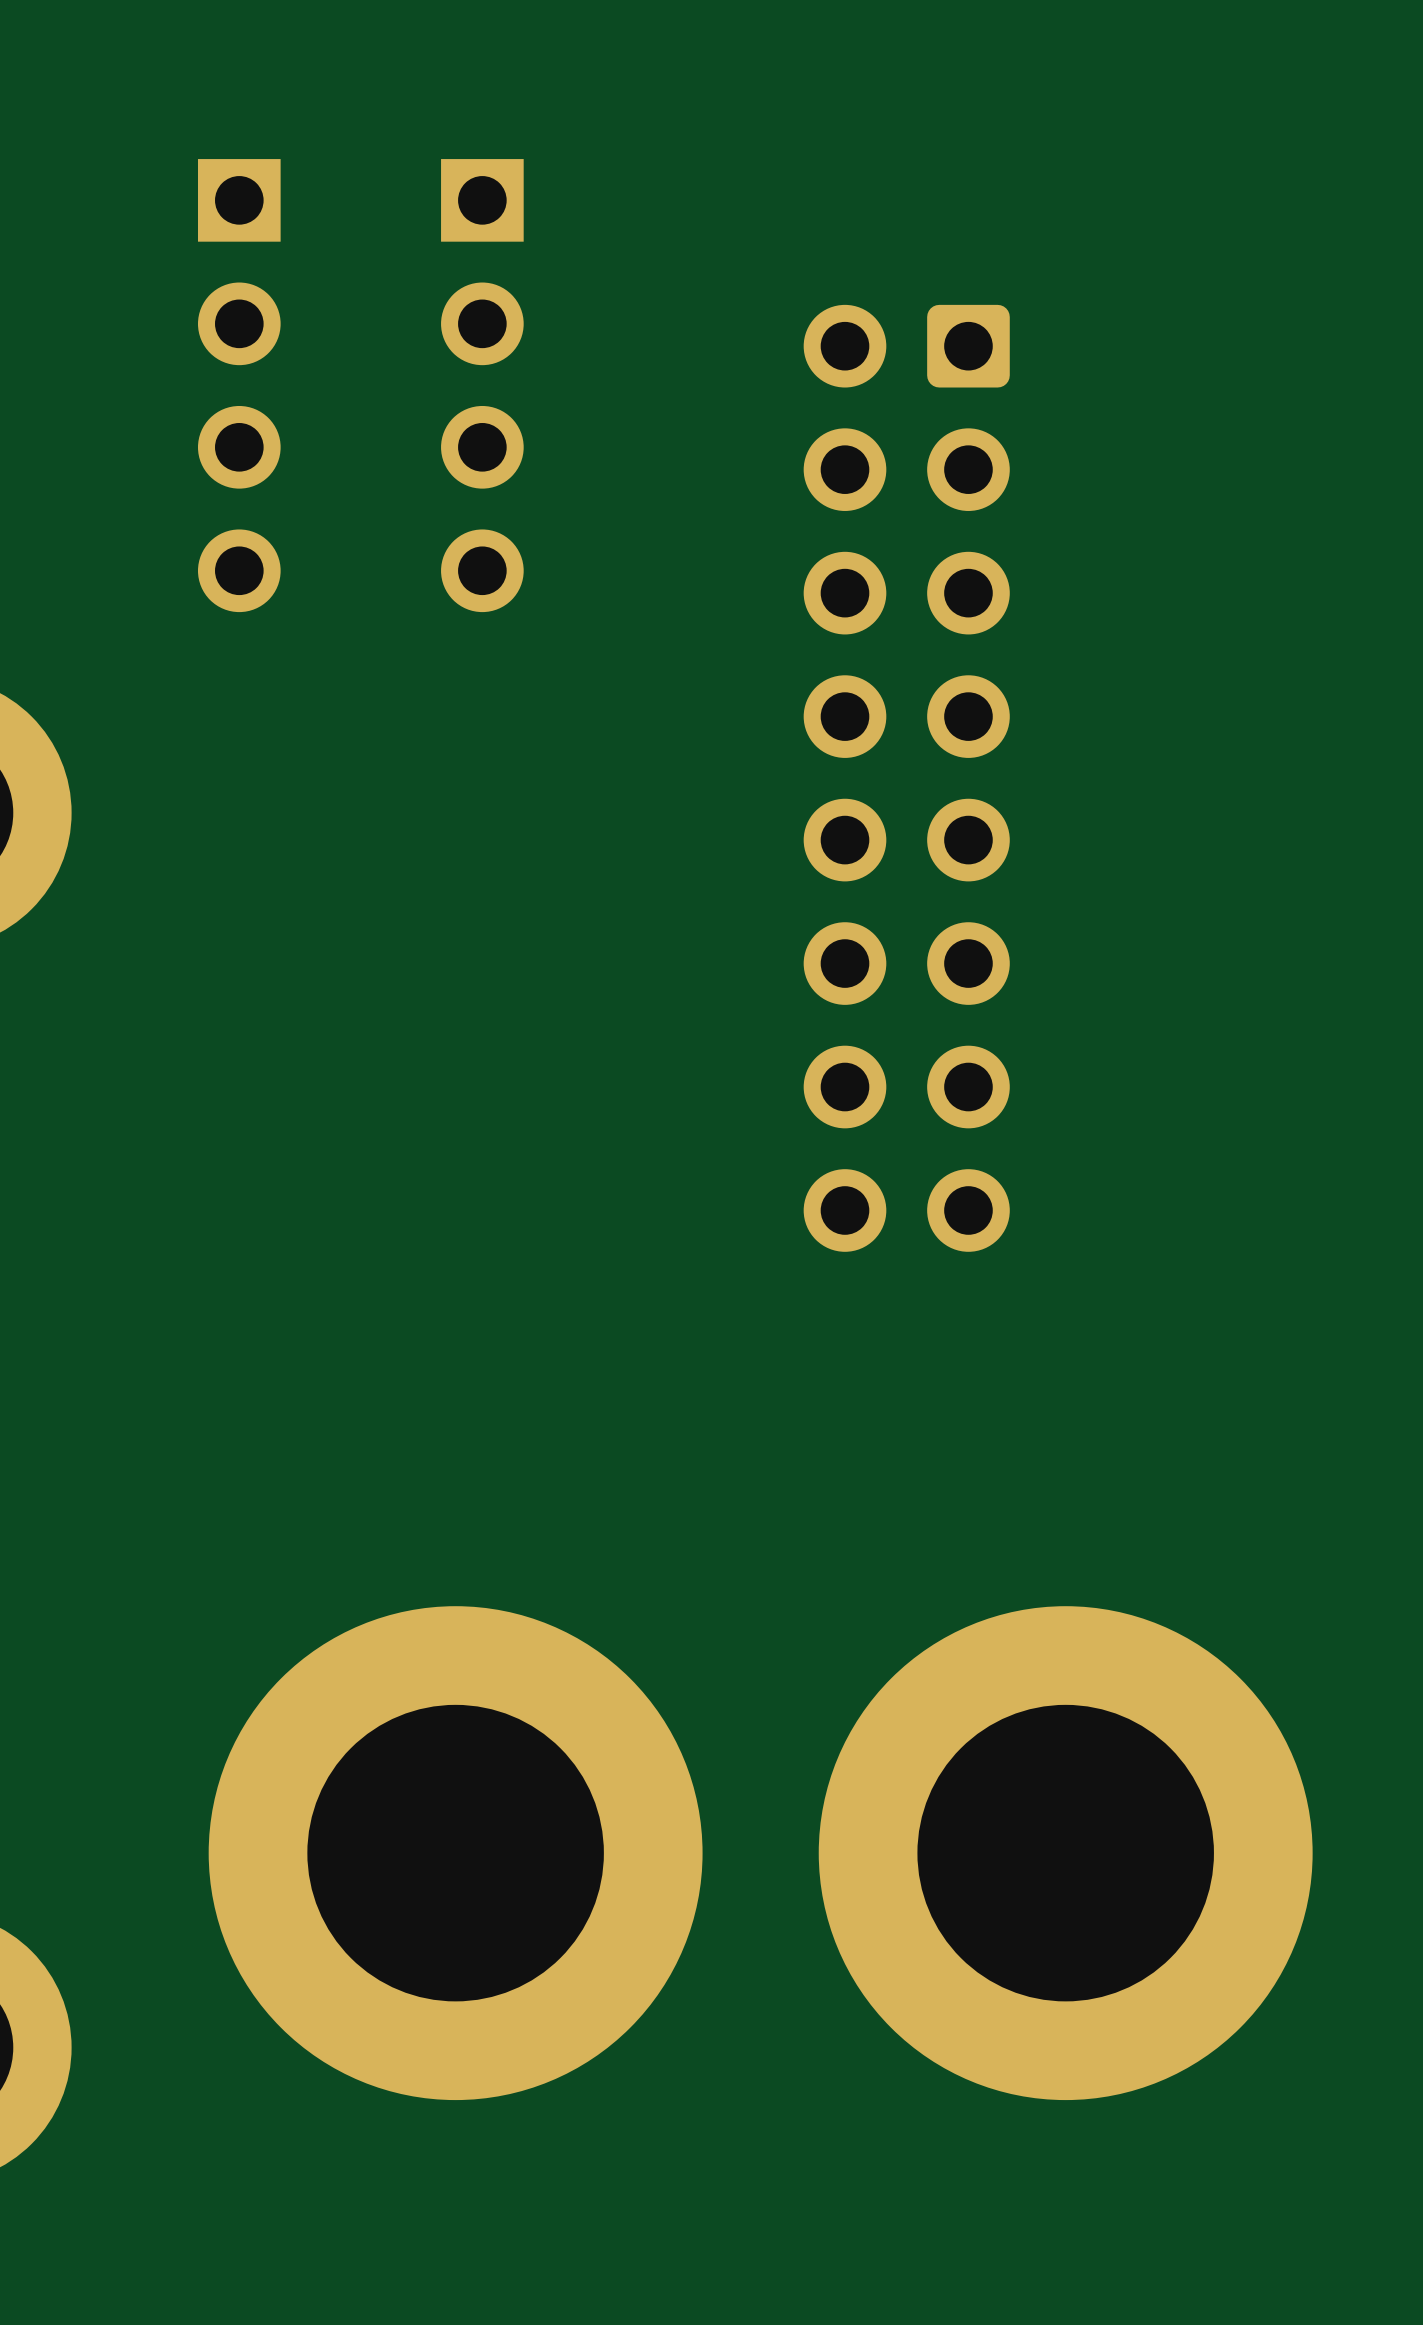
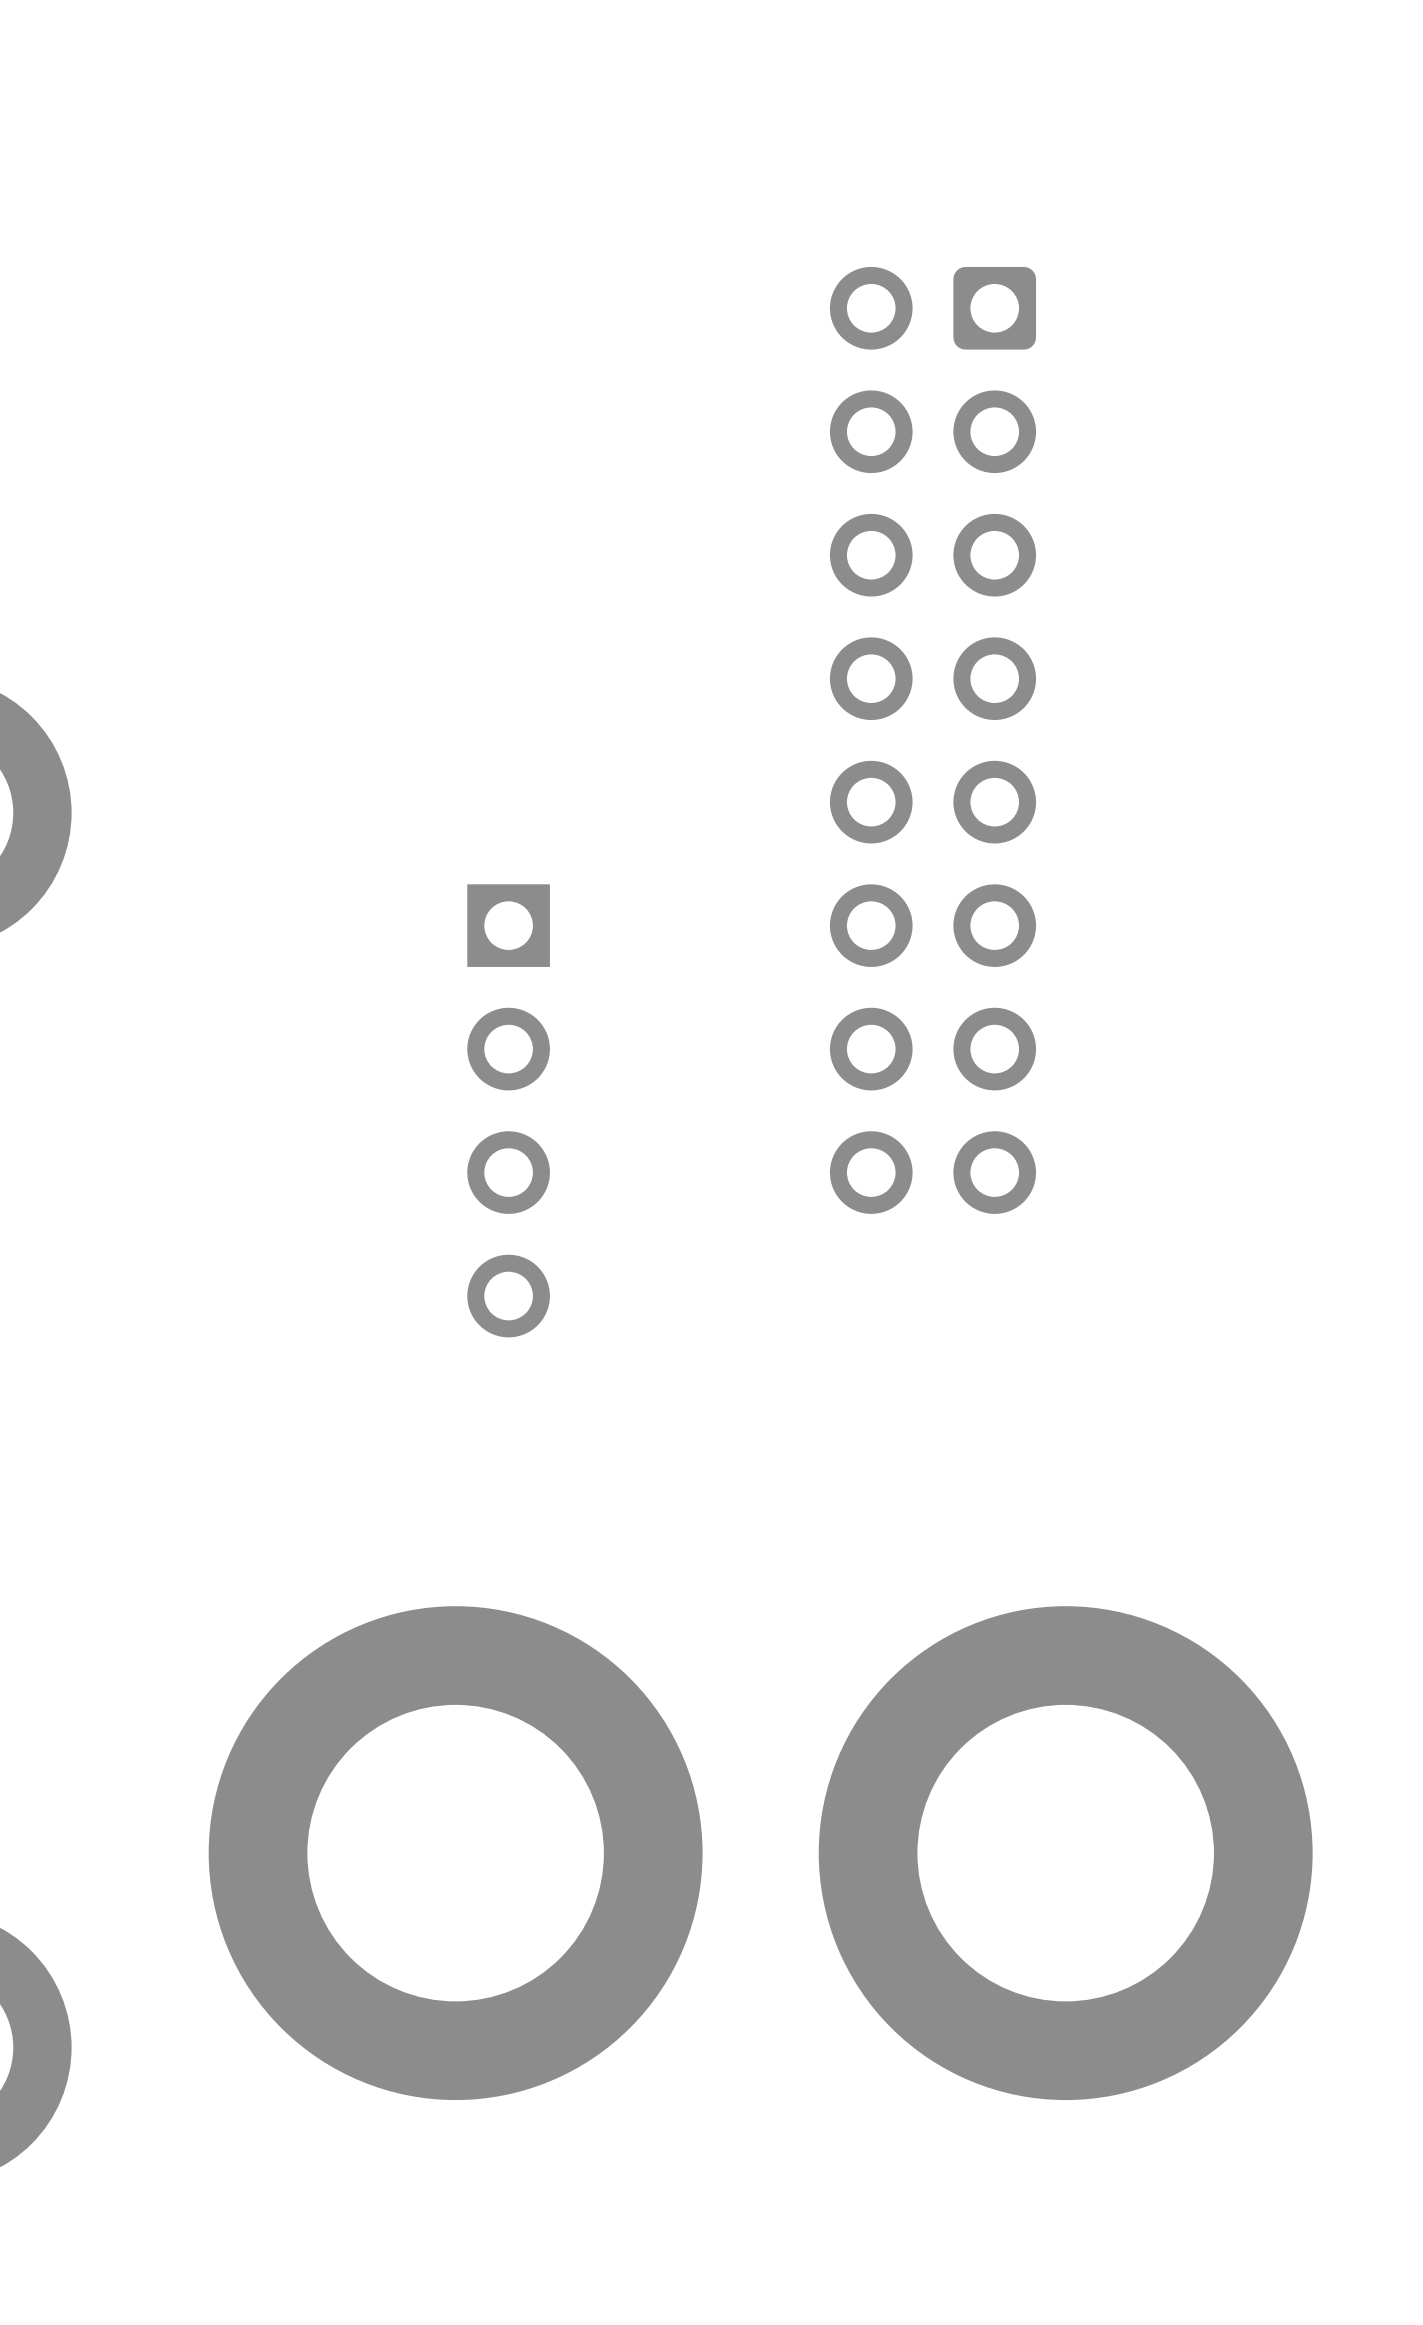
part: (239, 385) -> none
part: (482, 385) -> none
part position: (906, 778) -> (932, 740)
part: none -> (508, 1110)

